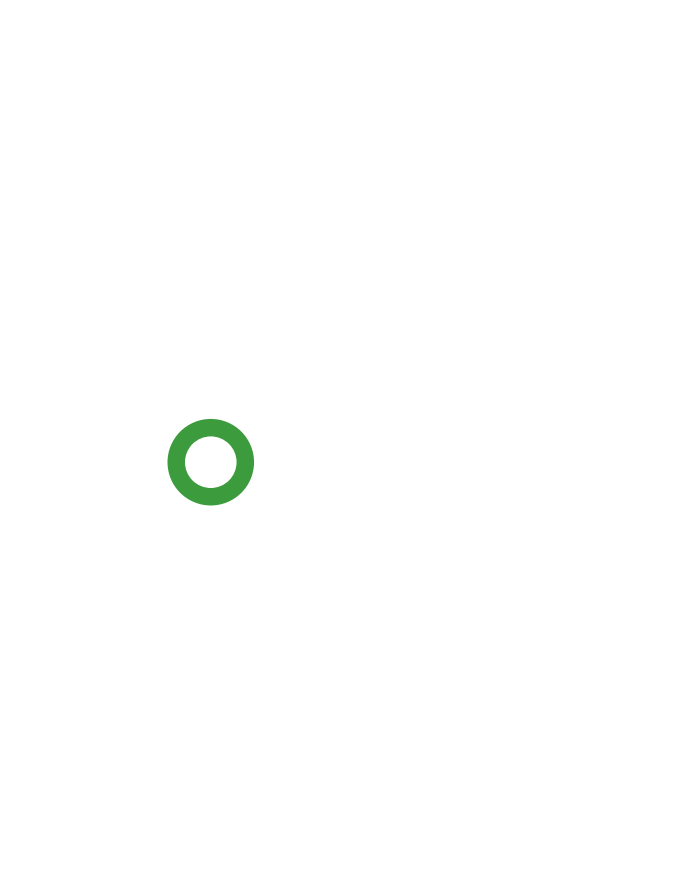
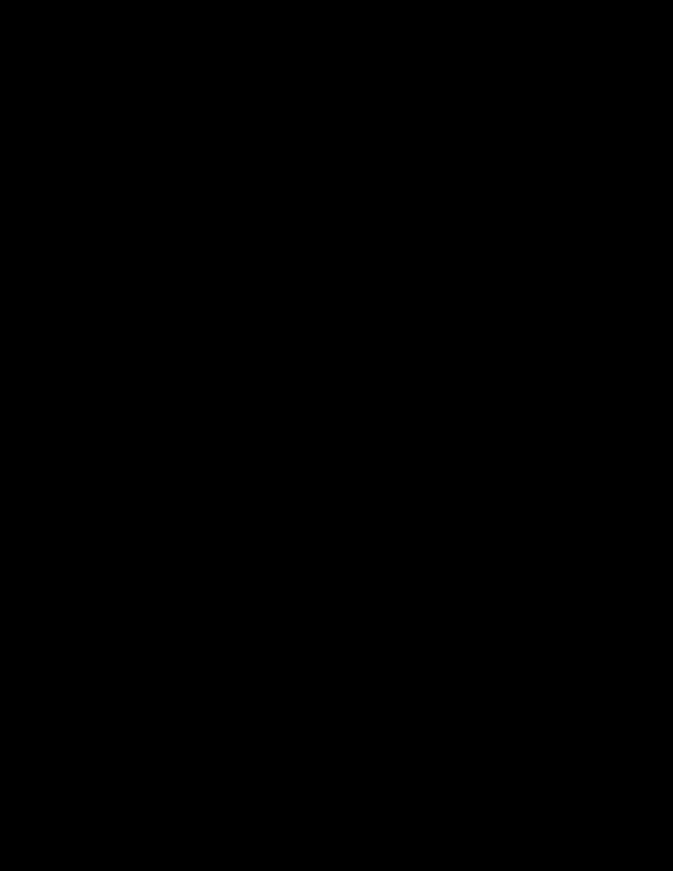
via: (210, 462) -> none

